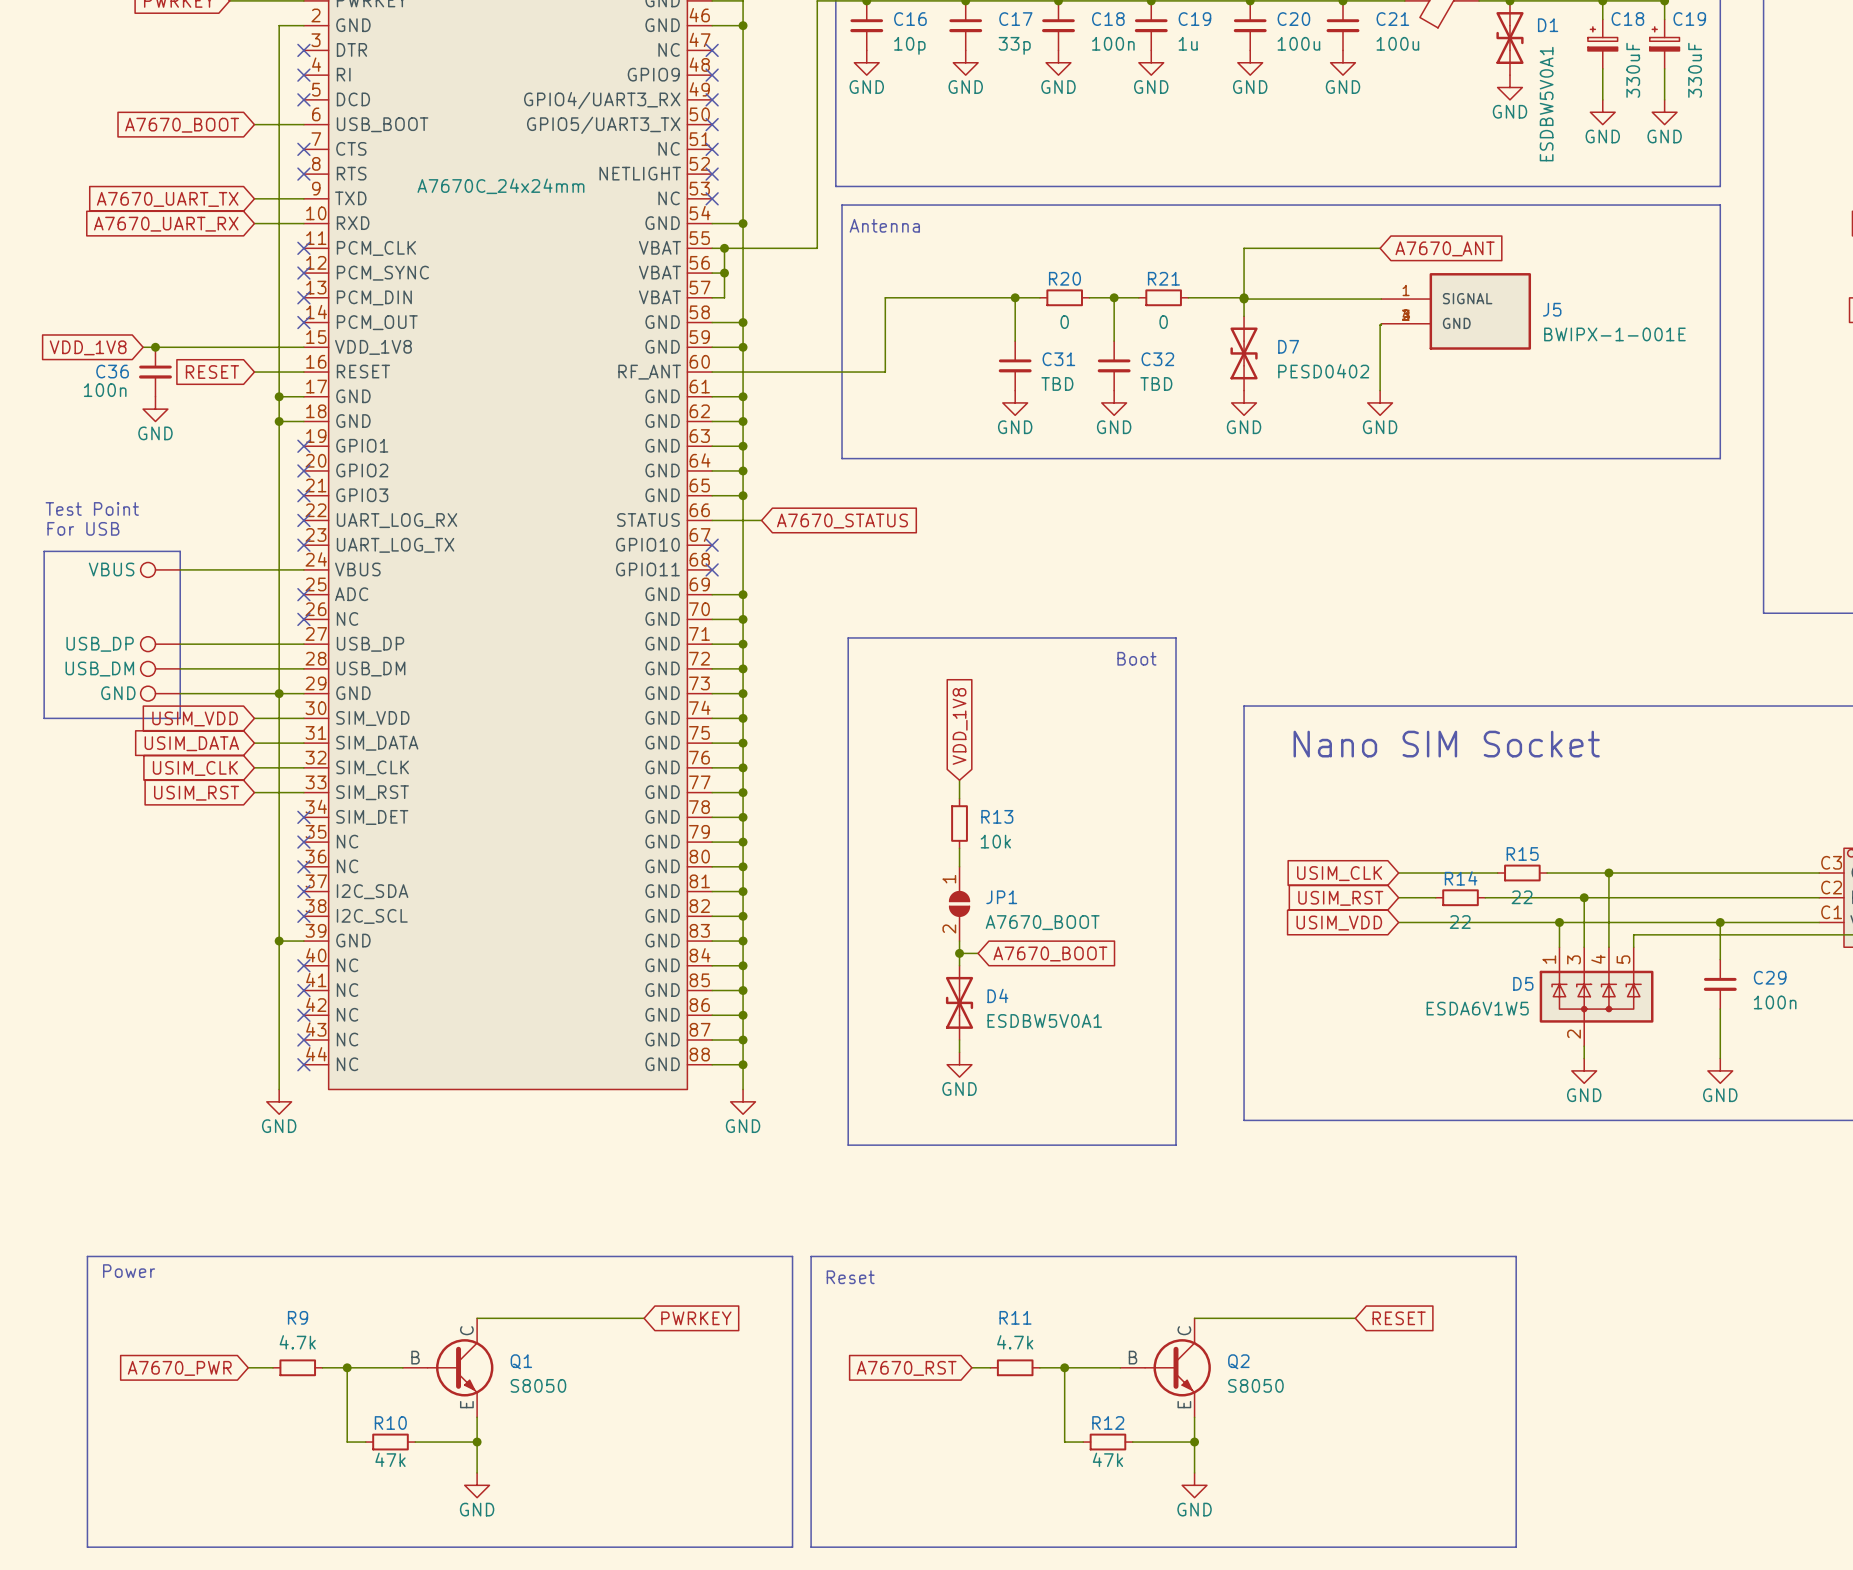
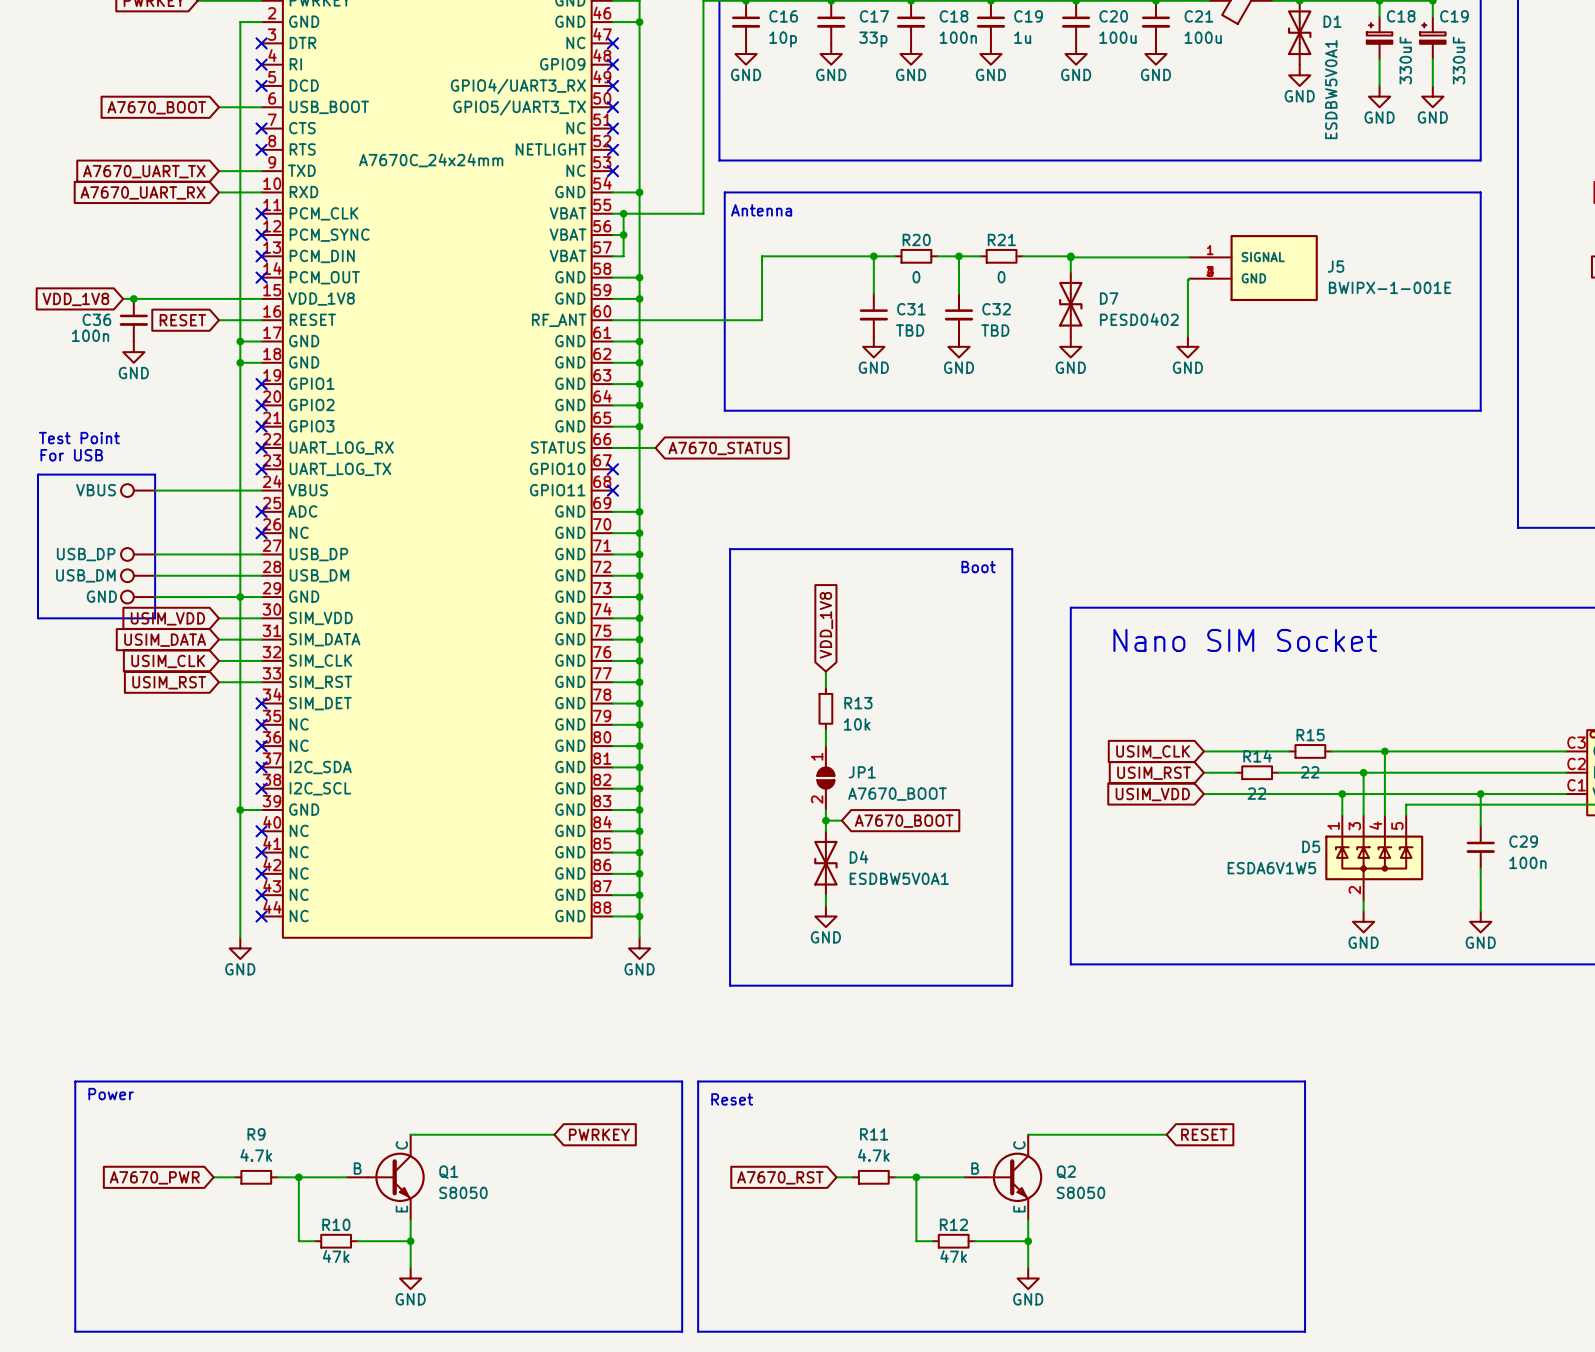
line: (842, 223) (842, 205) (1720, 205) (1720, 223) -> (724, 192) (1480, 192)
text position: Antenna (884, 225) -> Antenna (761, 210)
wire: (1380, 248) (1244, 248) (1244, 297) -> none
global label: A7670_ANT (1445, 248) -> none
line: (842, 458) (1720, 458) -> (724, 394) (724, 410) (1480, 410) (1480, 394)

